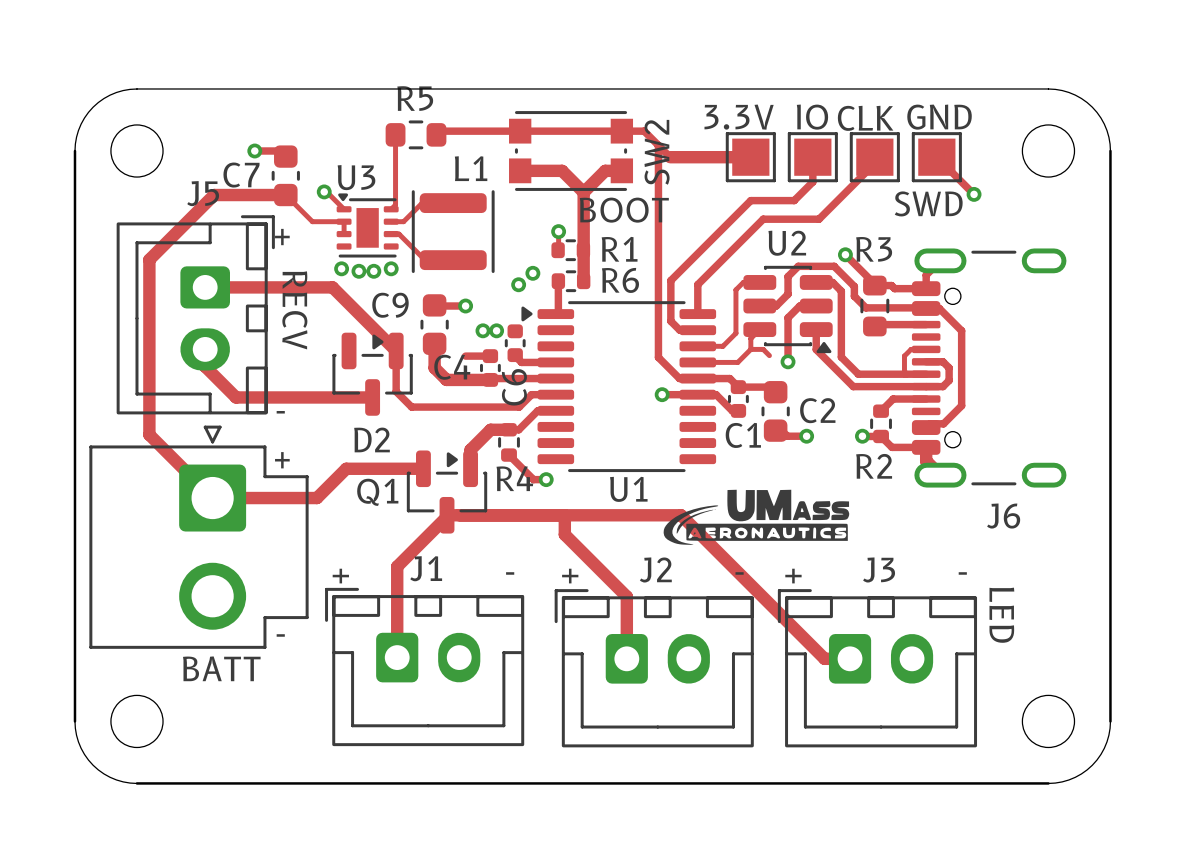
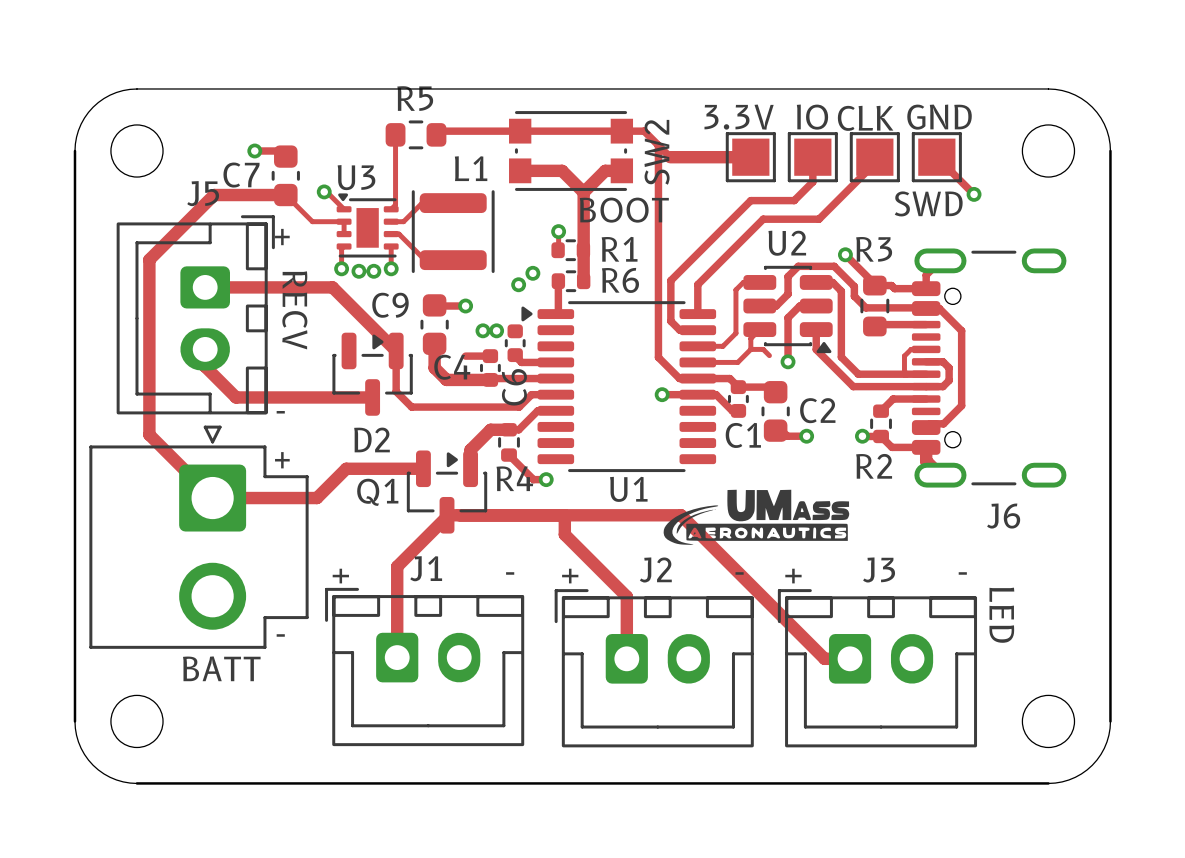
track: none -> (344, 246) (341, 248) (341, 268)
track: none -> (391, 246) (391, 268)

